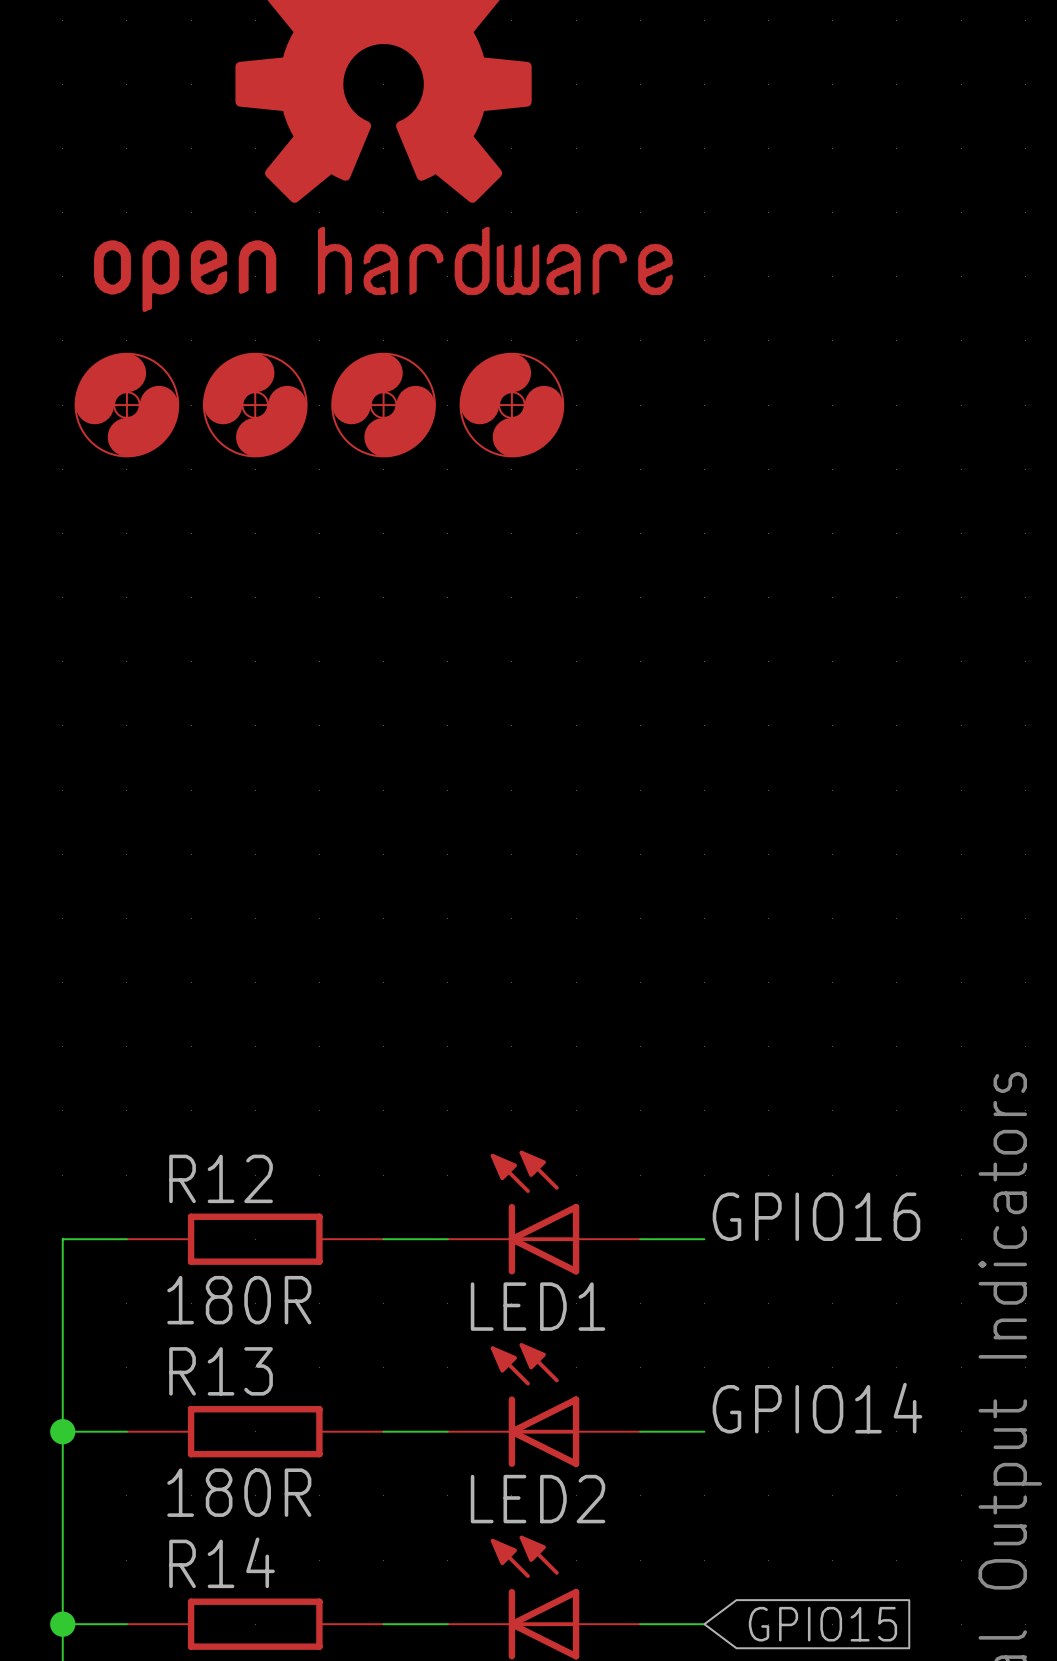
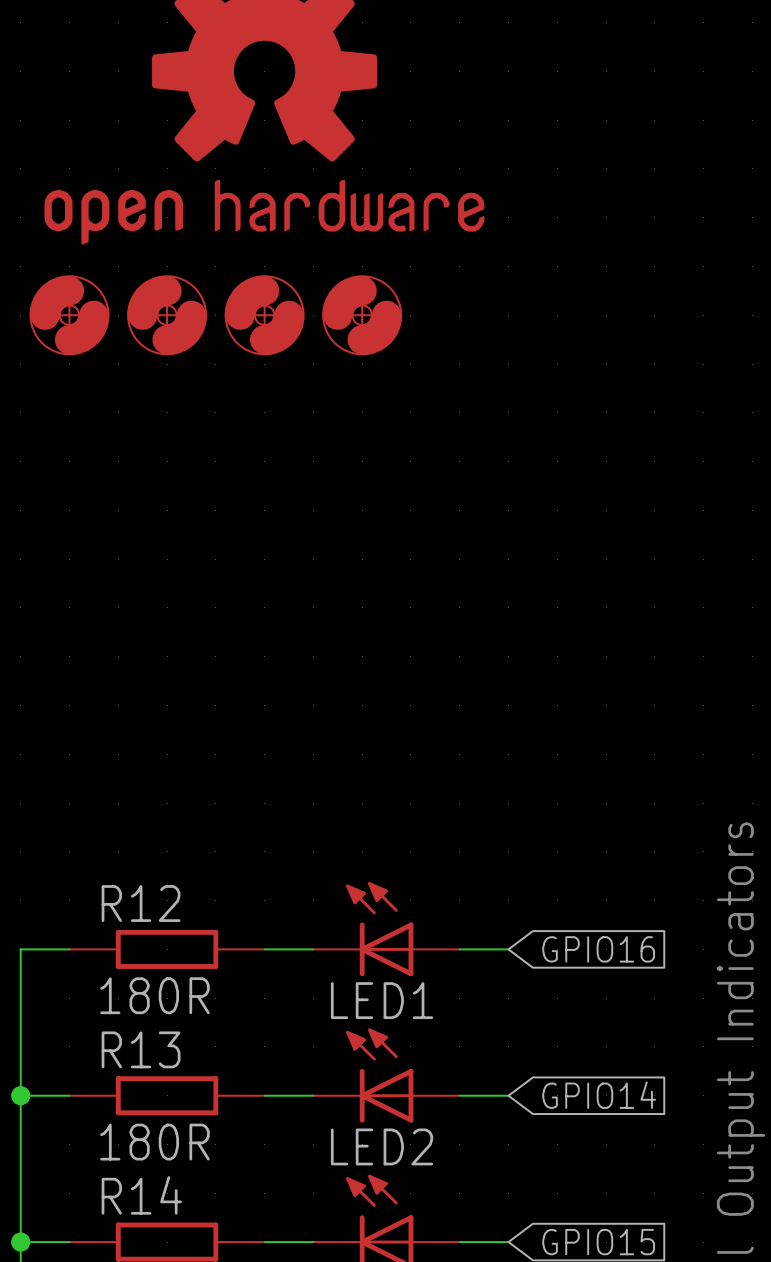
label: GPIO16 (816, 1216) -> none
global label: none -> GPIO16 (598, 949)
label: GPIO14 (817, 1408) -> none
global label: none -> GPIO14 (599, 1095)

